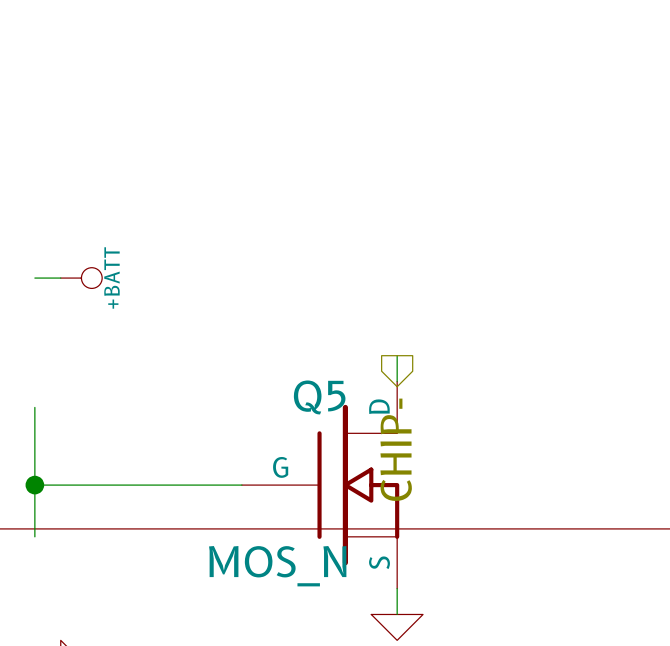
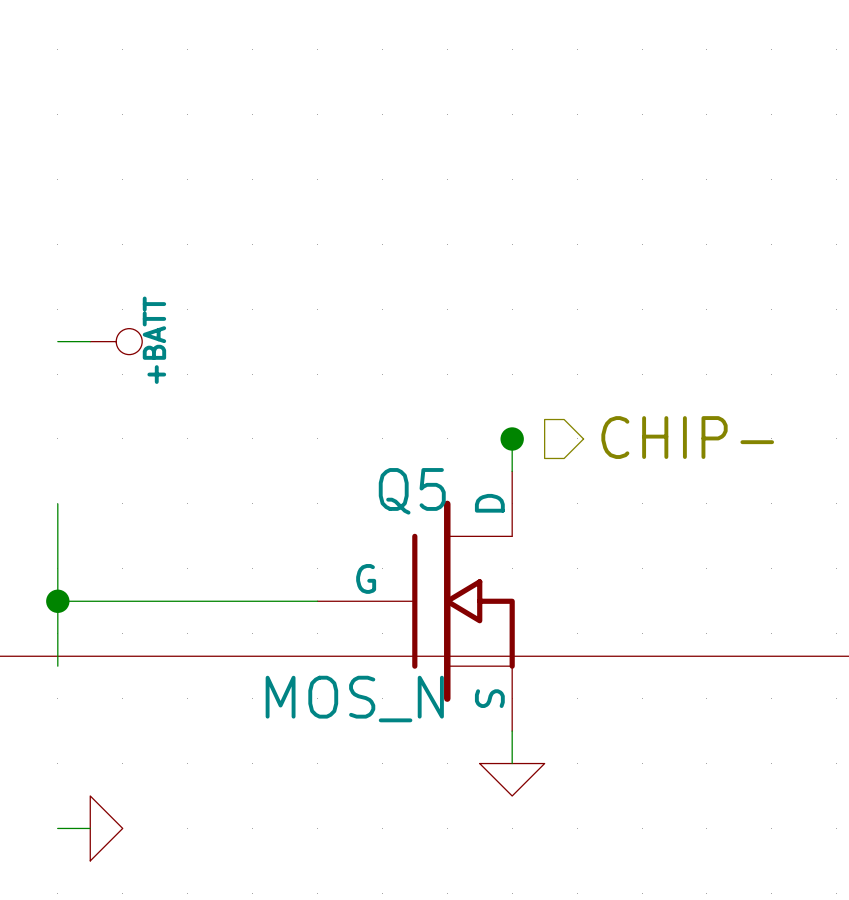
junction: none -> (512, 438)
hierarchical label rotation: 0° (396, 449) -> 90° counterclockwise (687, 437)
hierarchical label position: CHIP- (396, 449) -> CHIP- (687, 437)

